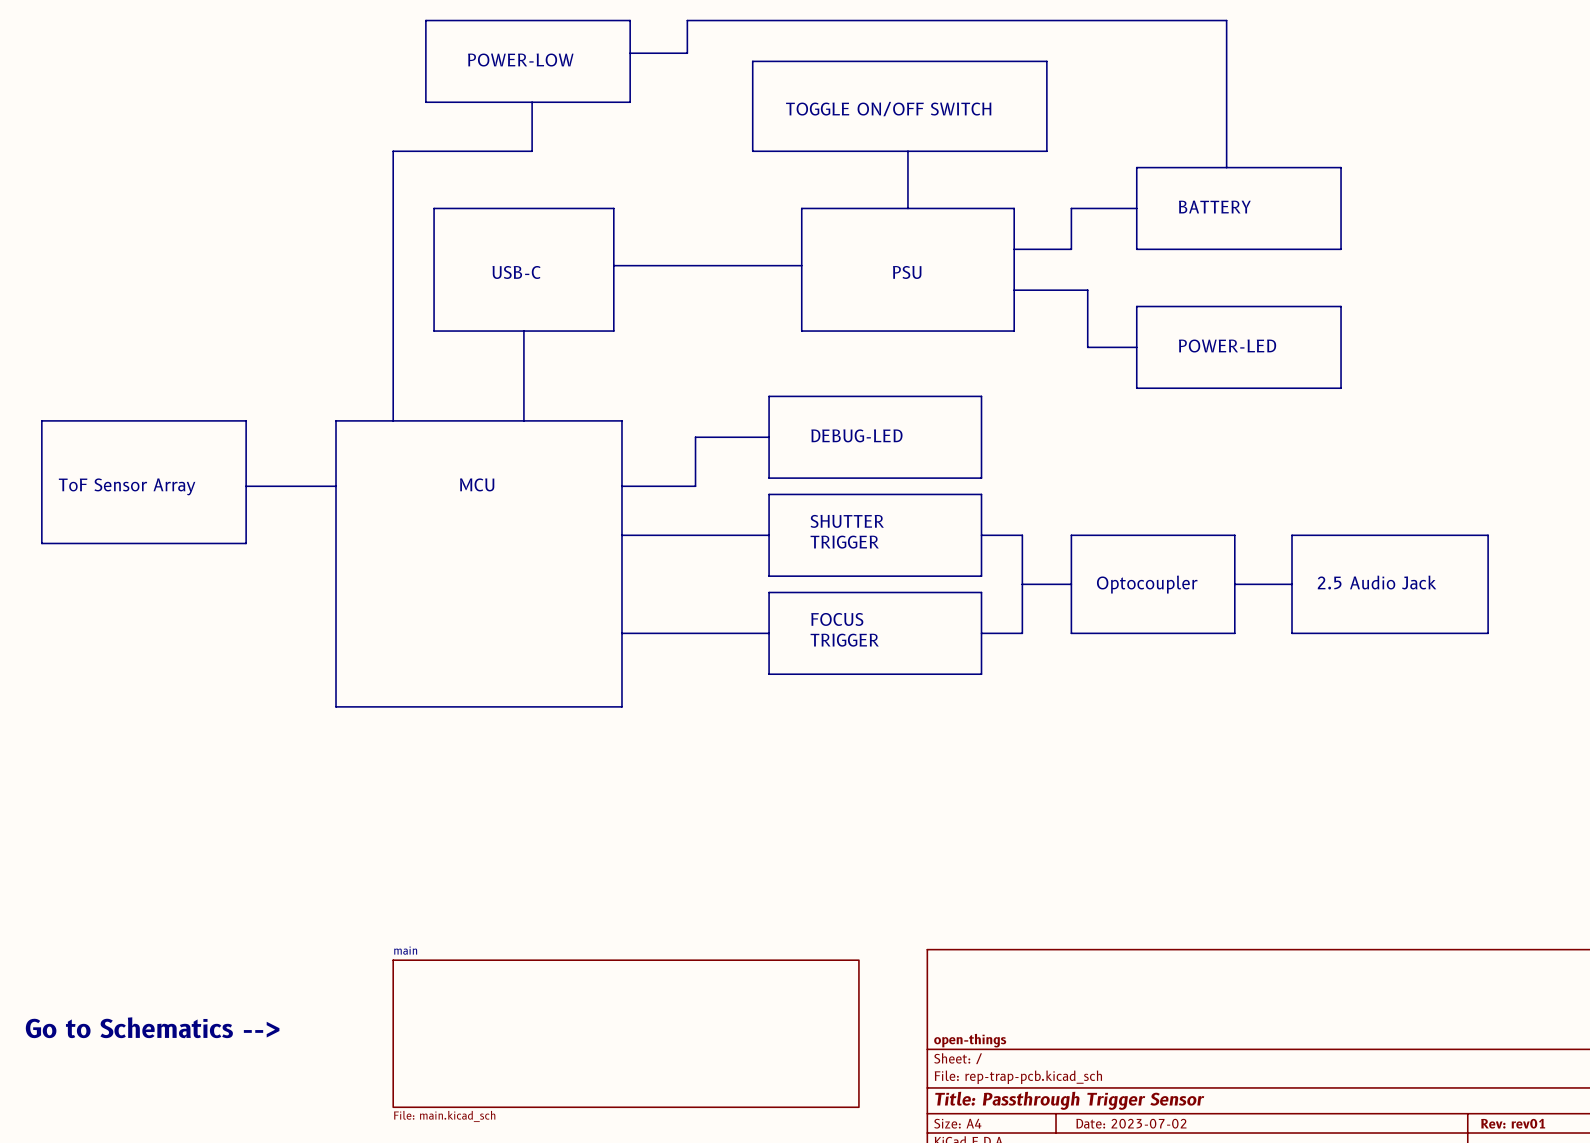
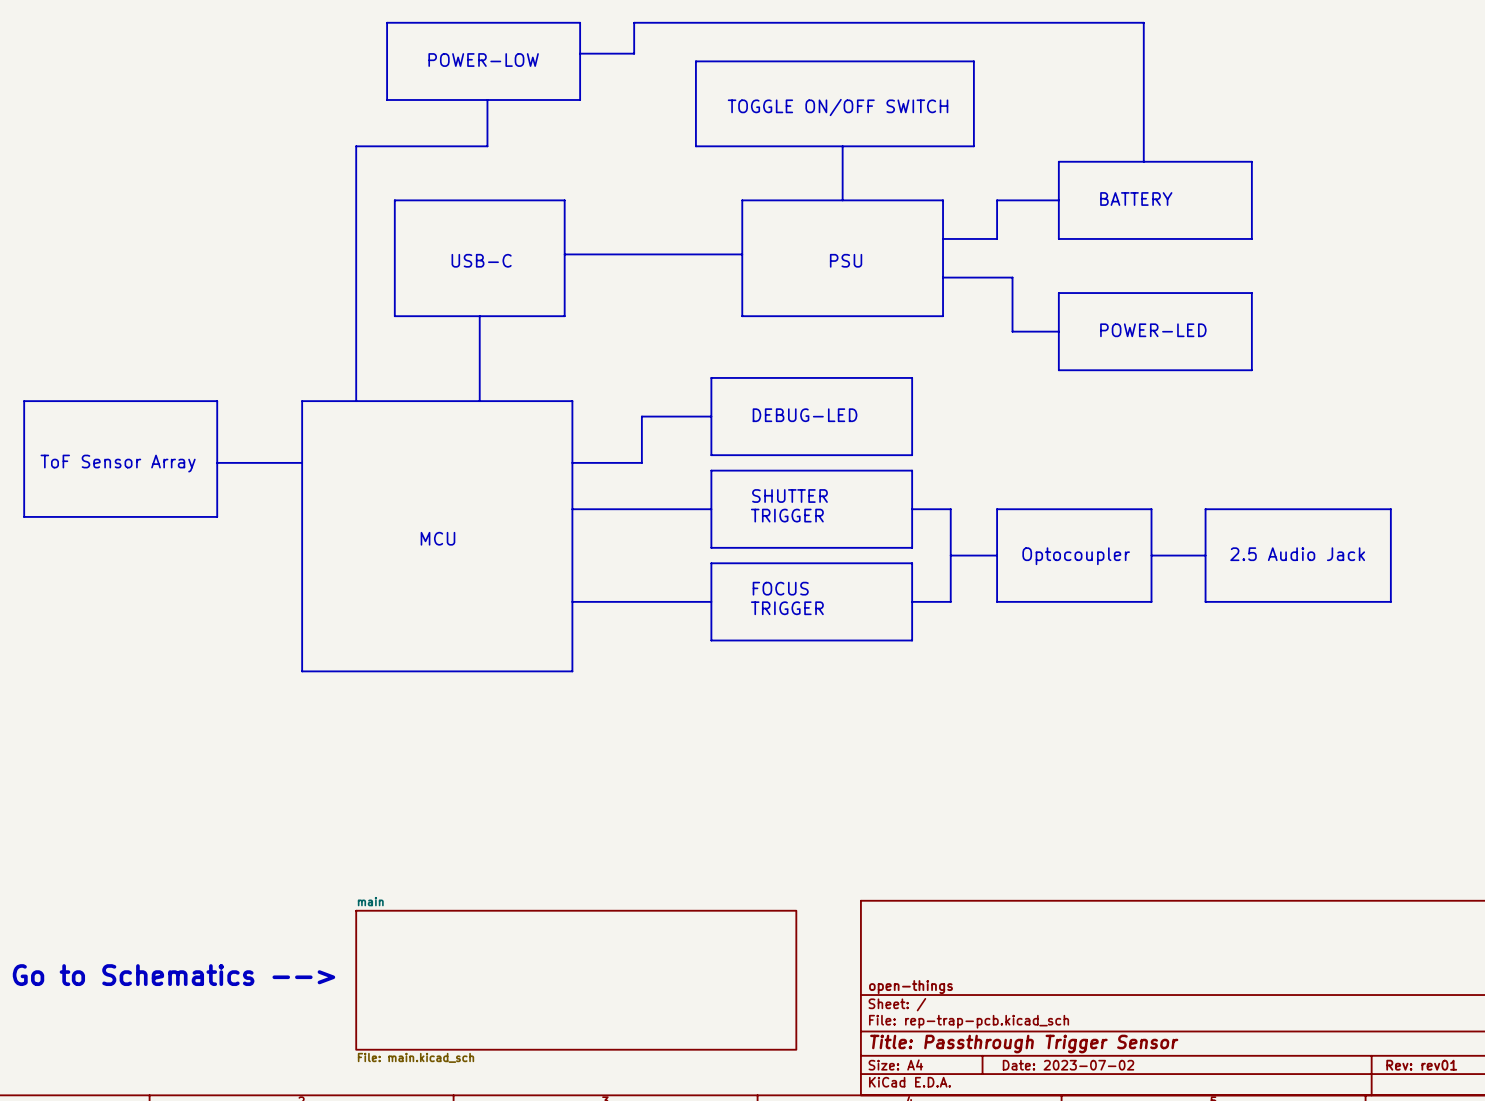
text position: MCU (477, 484) -> MCU (437, 538)

